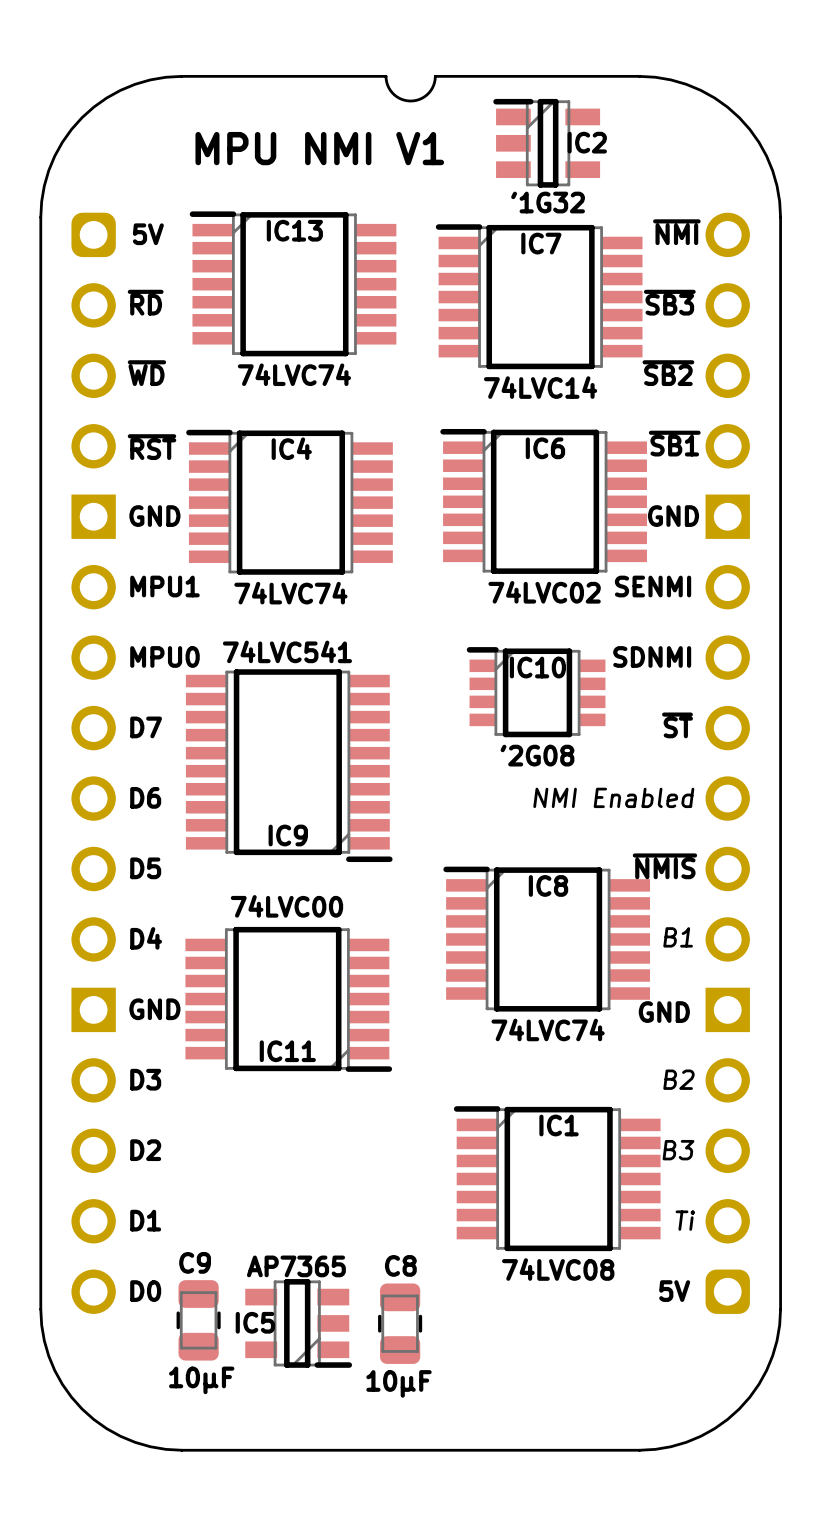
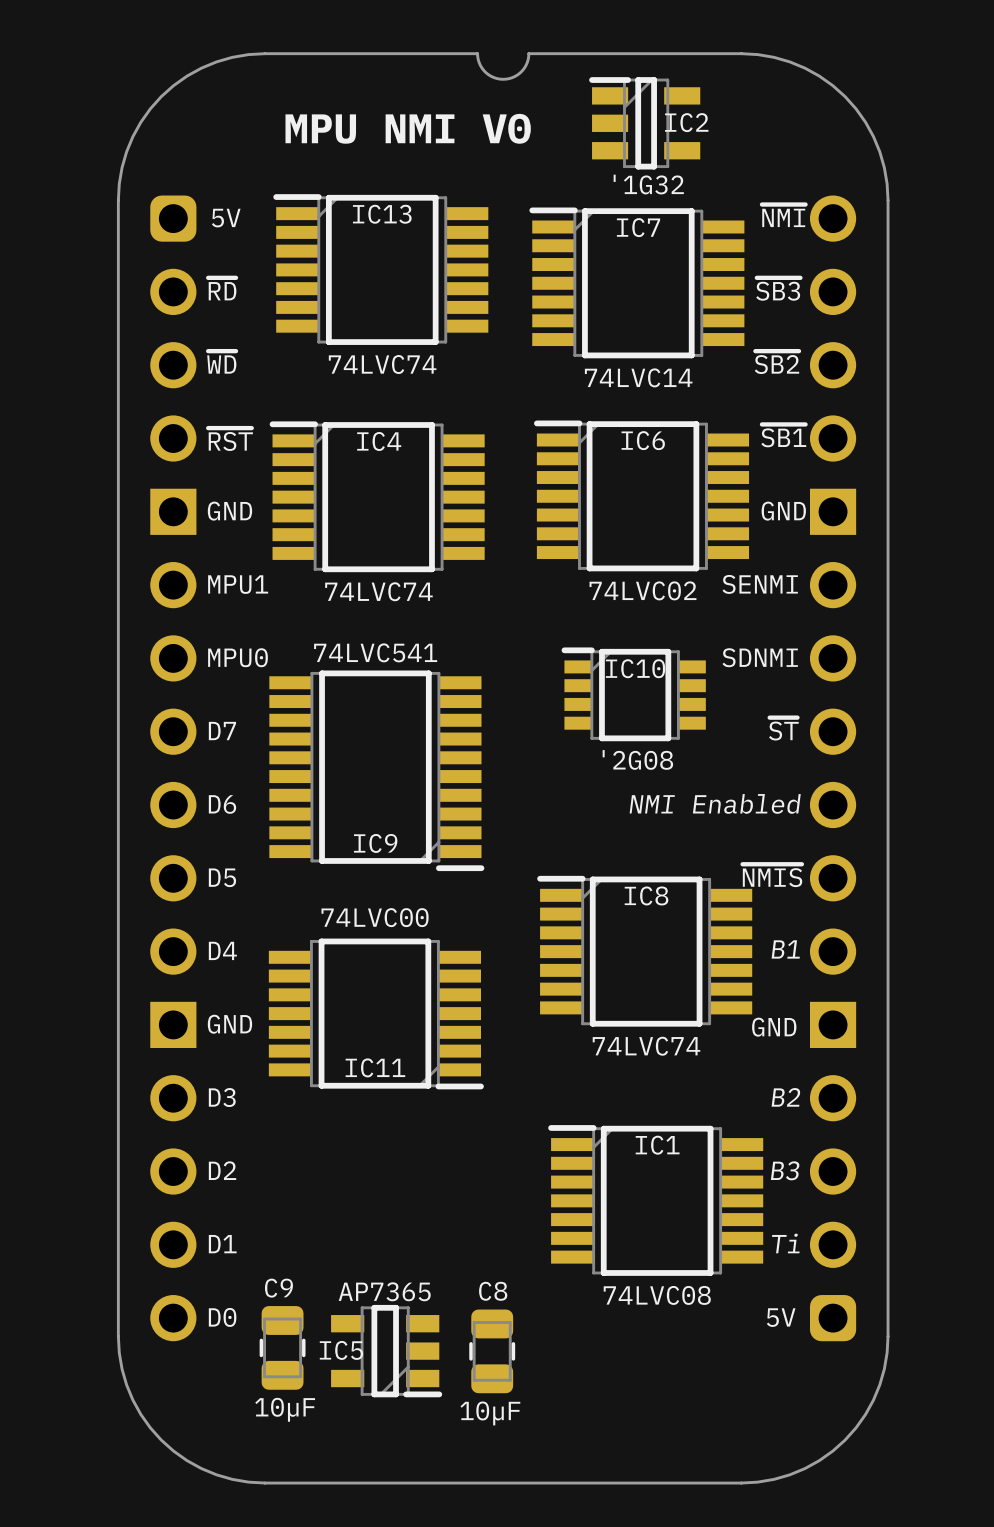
text: MPU NMI V1 (319, 148) -> MPU NMI V0 (408, 128)

